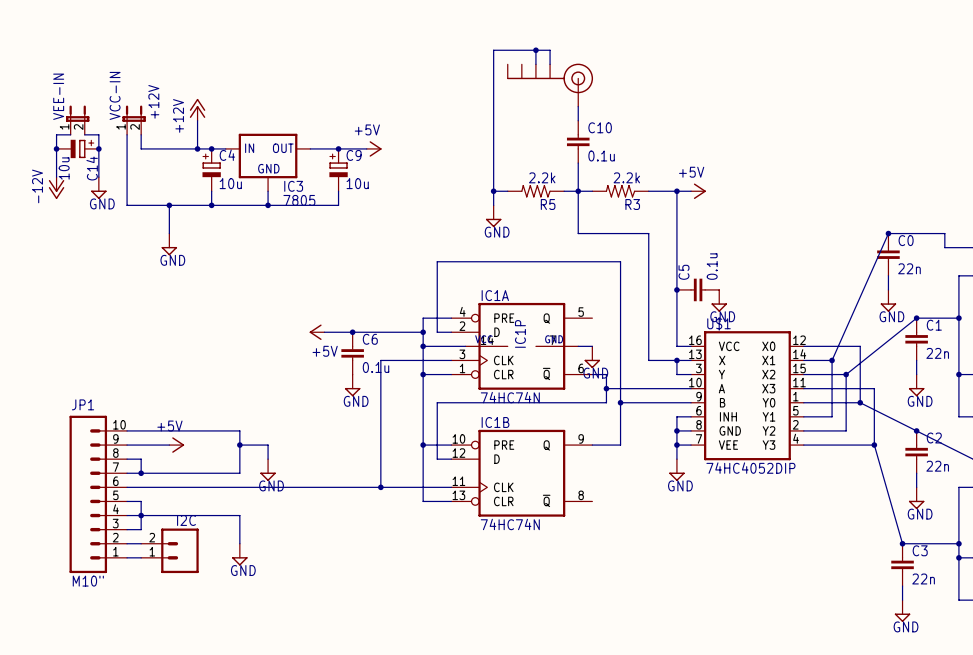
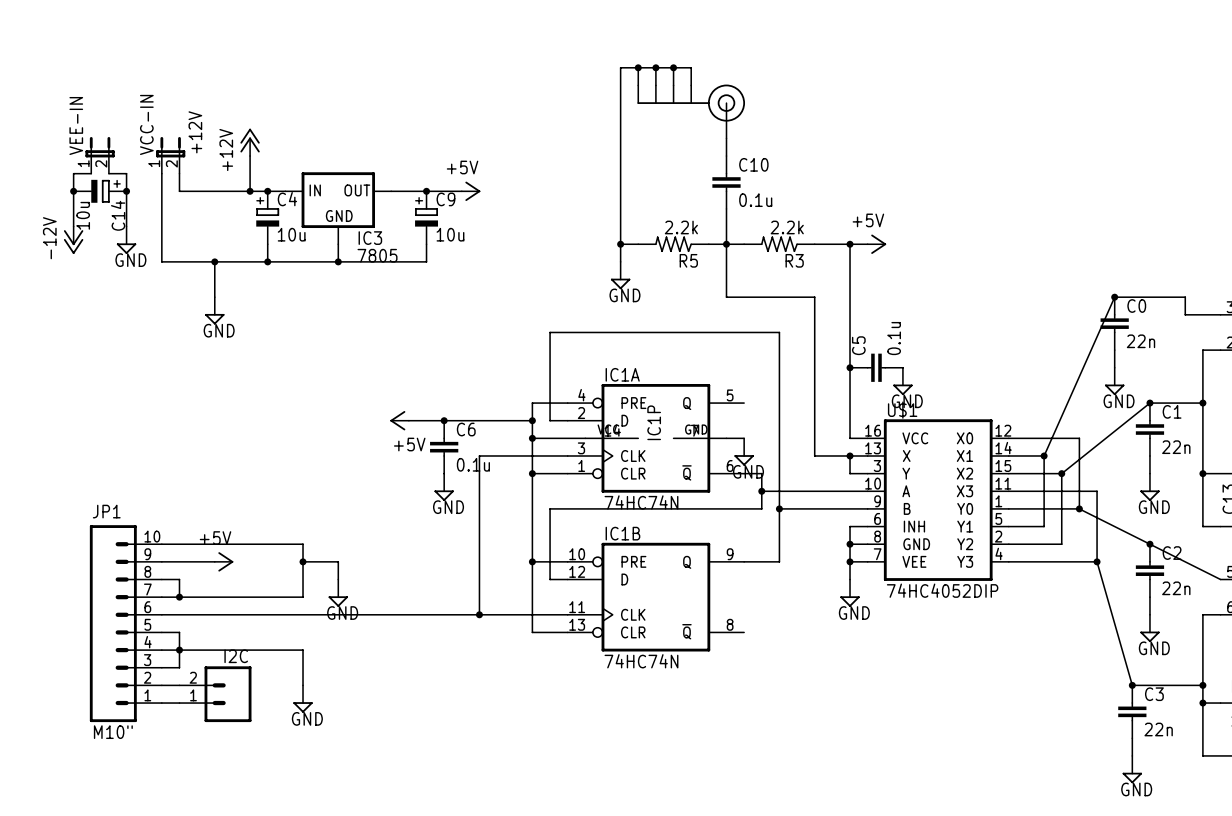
wire: none -> (638, 67) (638, 85)
junction: none -> (638, 67)
wire: none -> (655, 67) (655, 85)
junction: none -> (655, 67)

